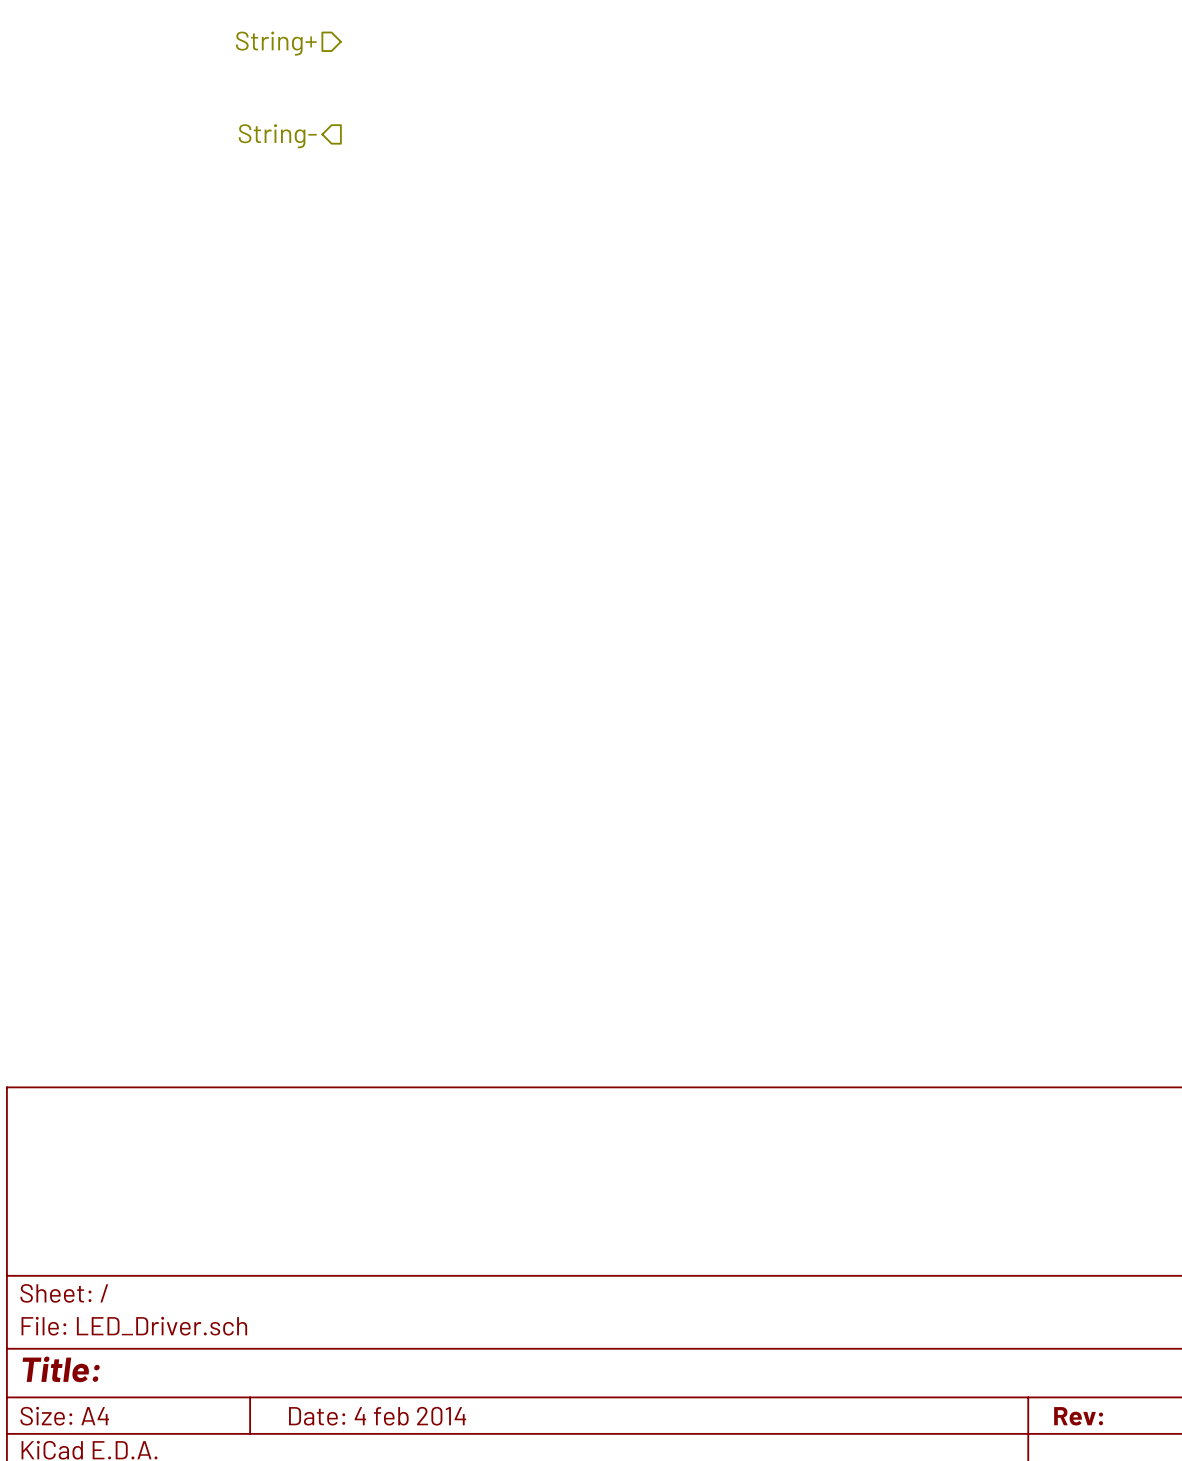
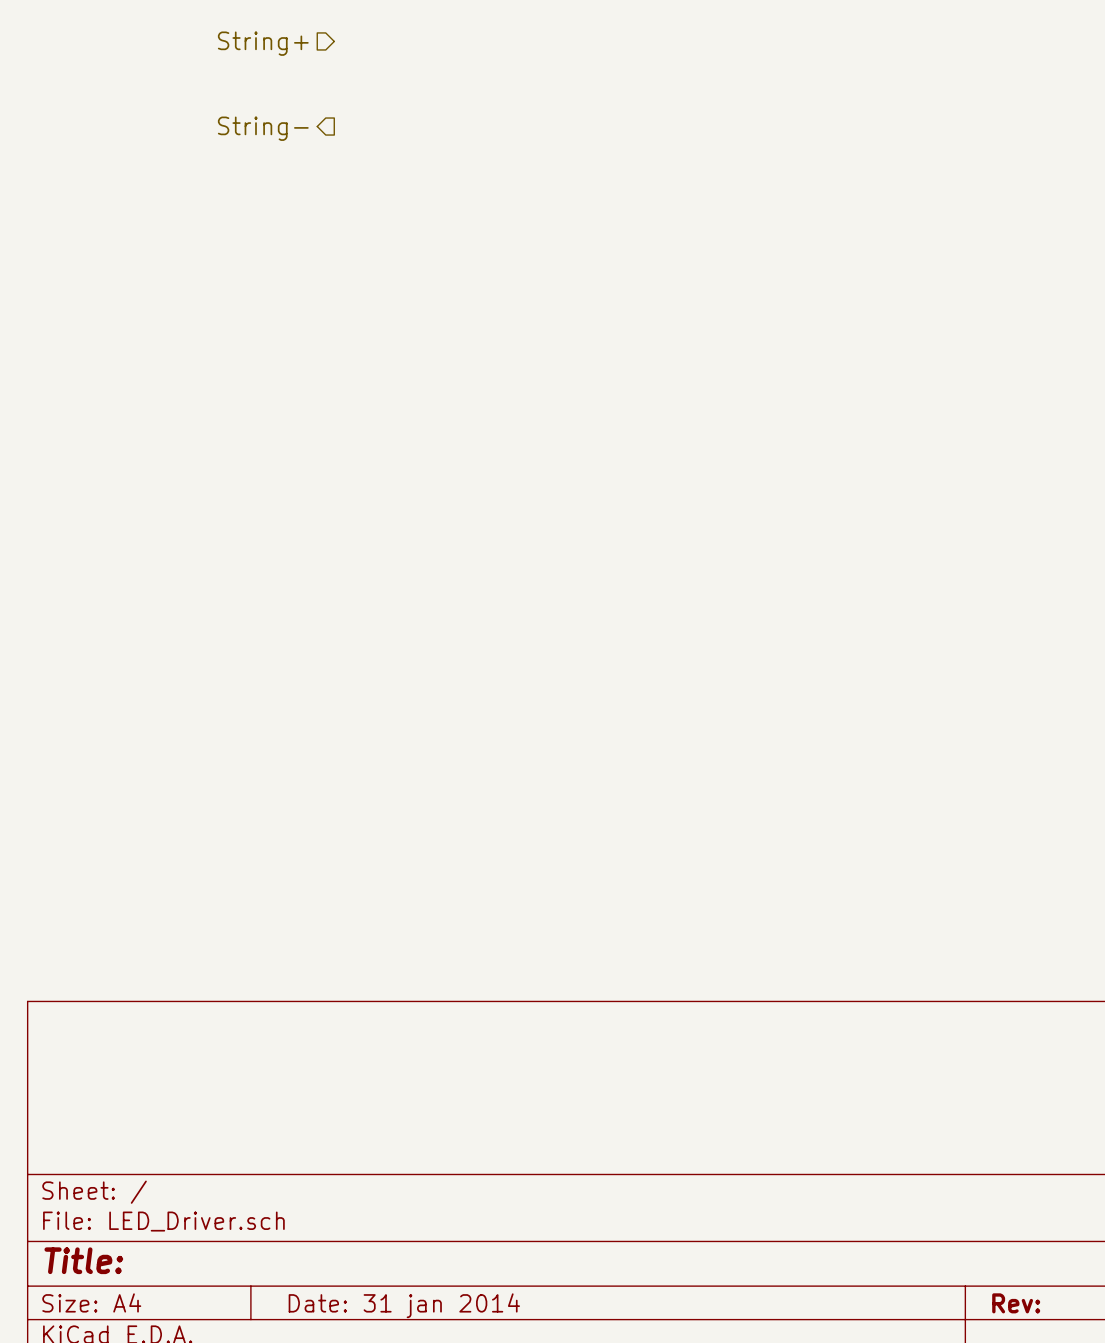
title block: Date: 4 feb 2014 (377, 1416) -> Date: 31 jan 2014 (404, 1305)

